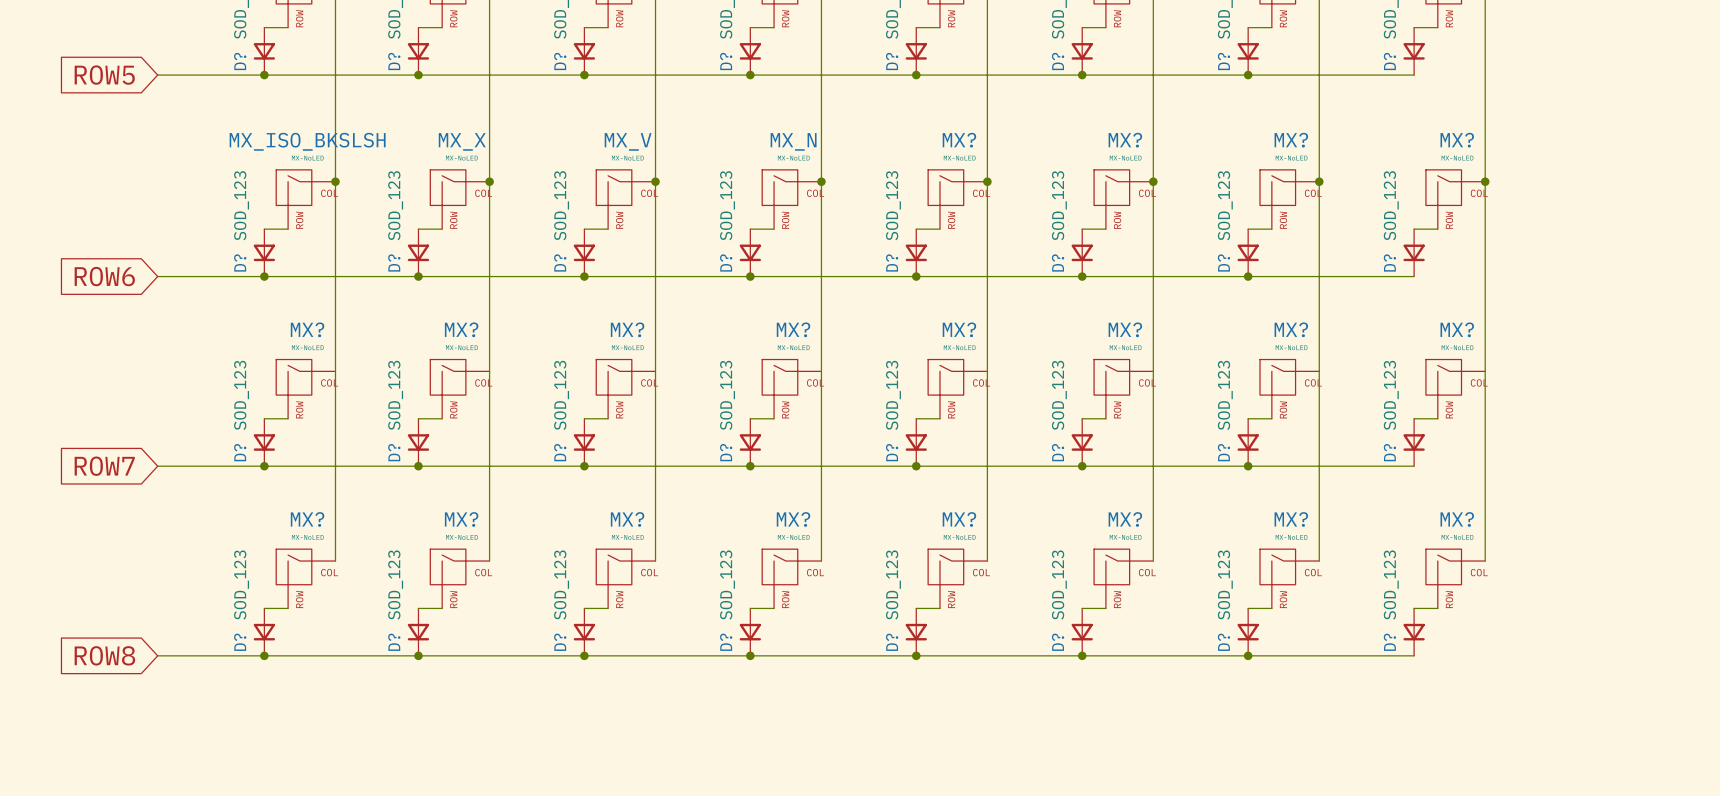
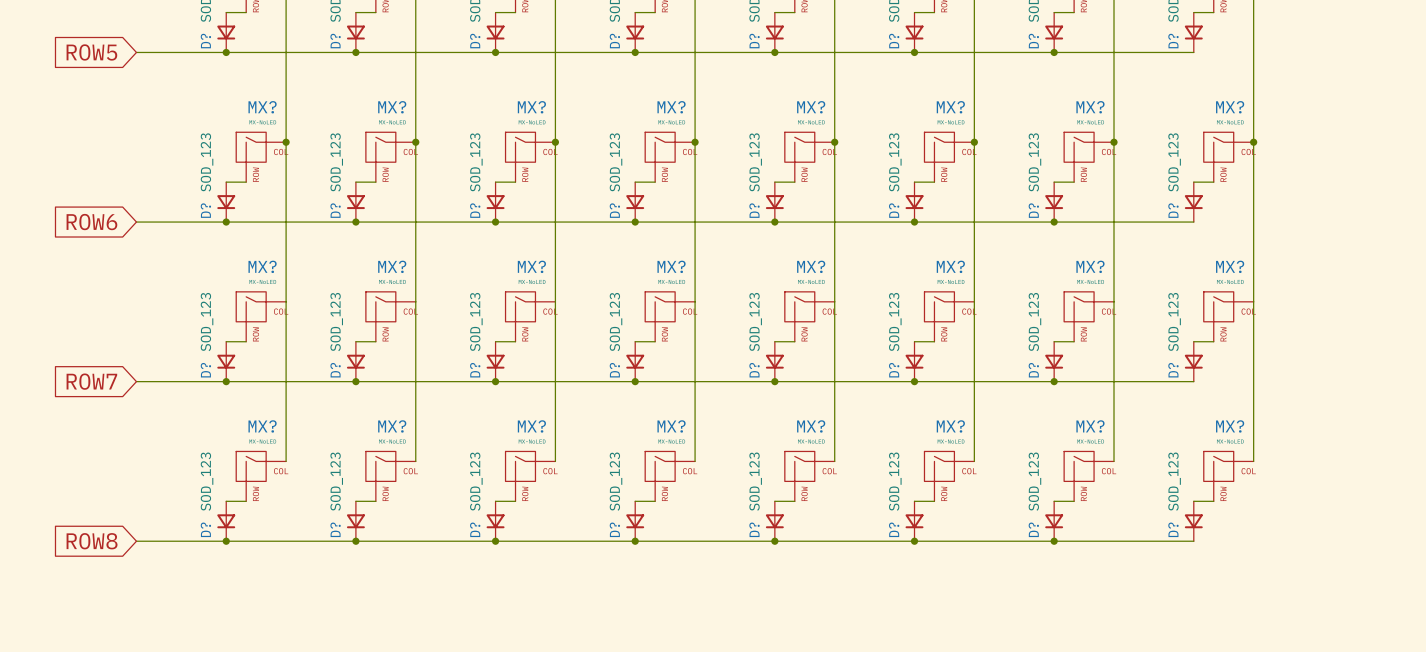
MX_ISO_BKSLSH name: MX_ISO_BKSLSH (307, 141) -> MX? (262, 107)
MX_X name: MX_X (462, 141) -> MX? (392, 107)
MX_V name: MX_V (628, 141) -> MX? (531, 107)
MX_N name: MX_N (793, 141) -> MX? (671, 107)

